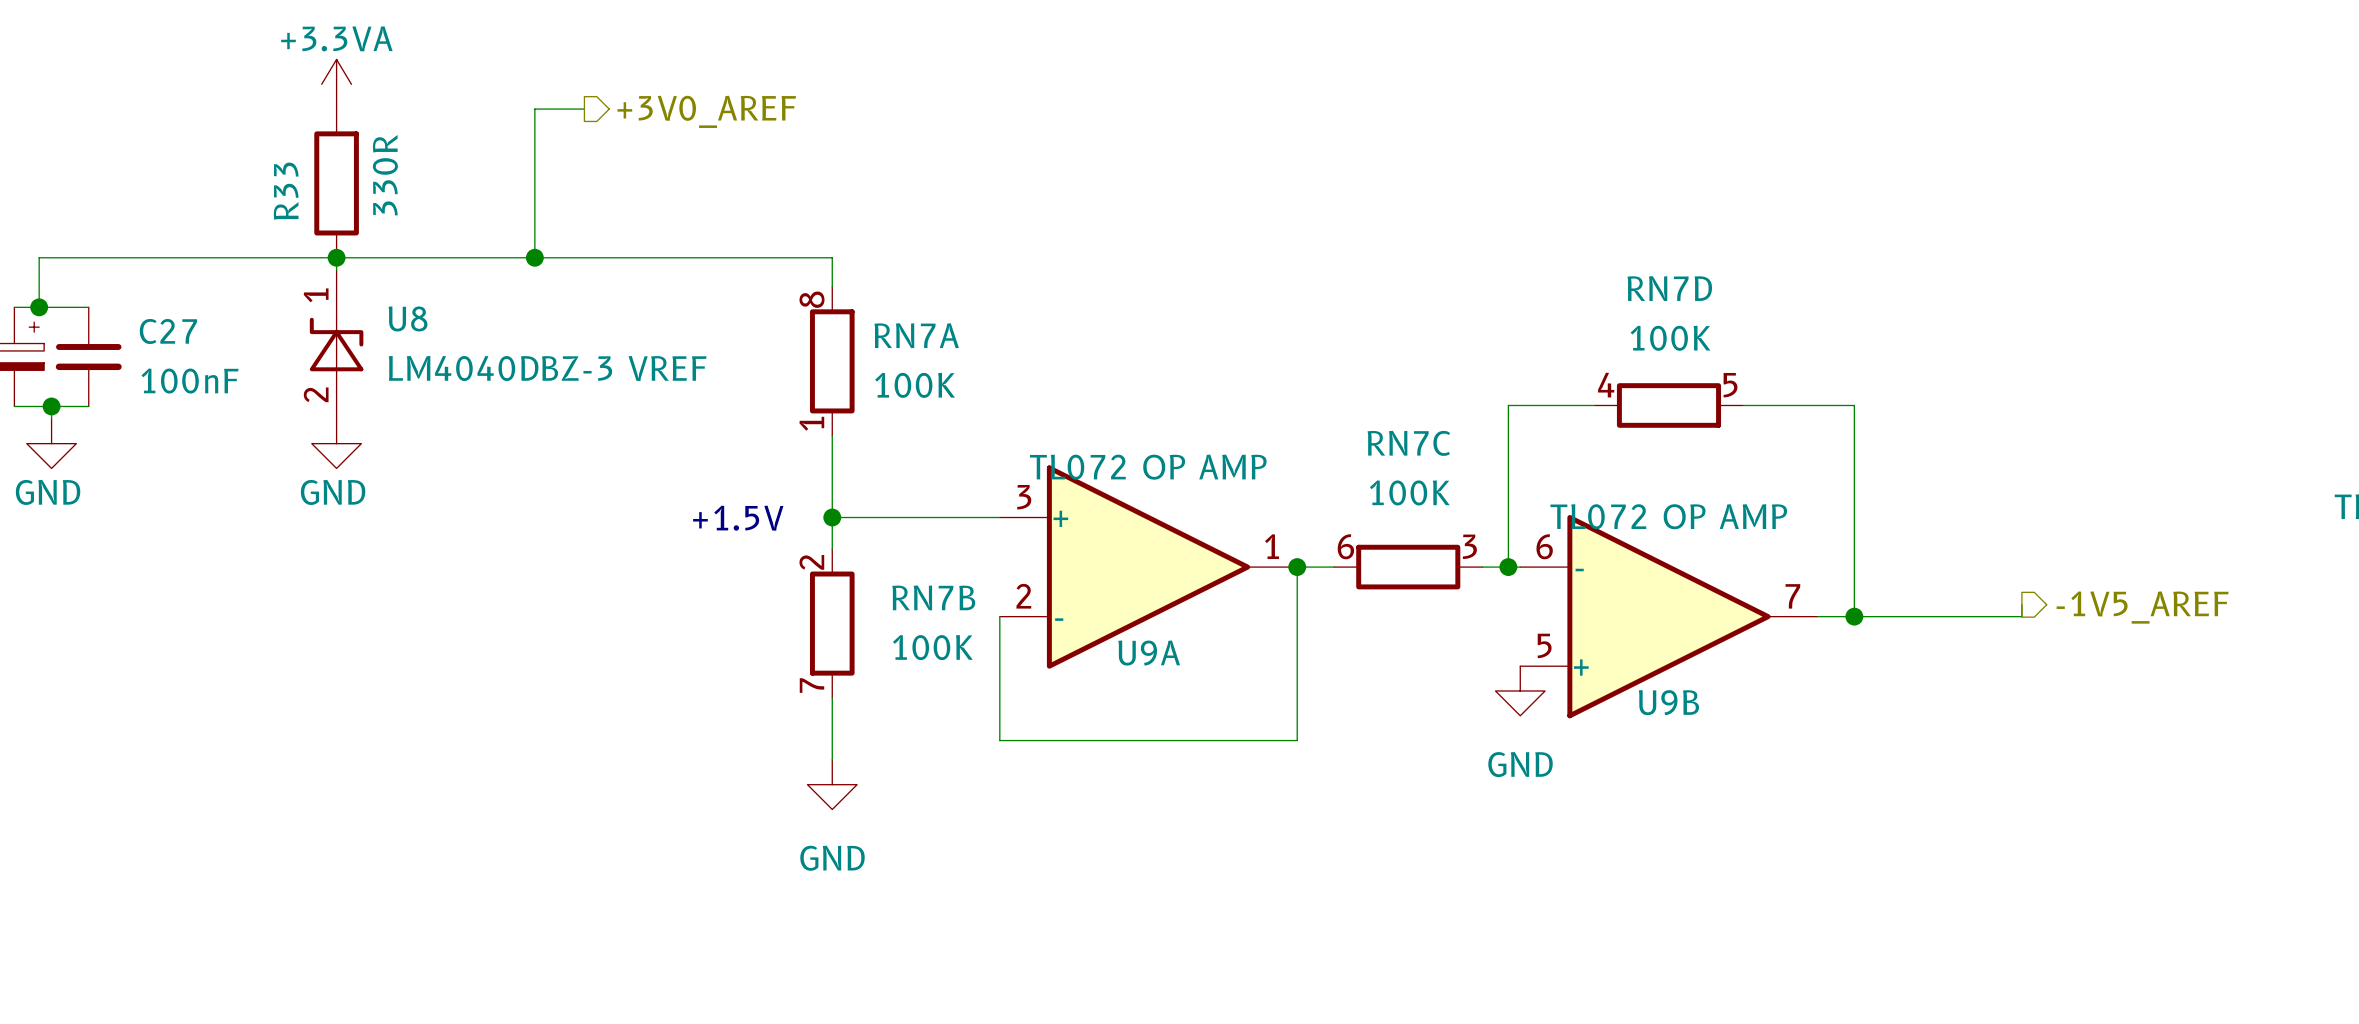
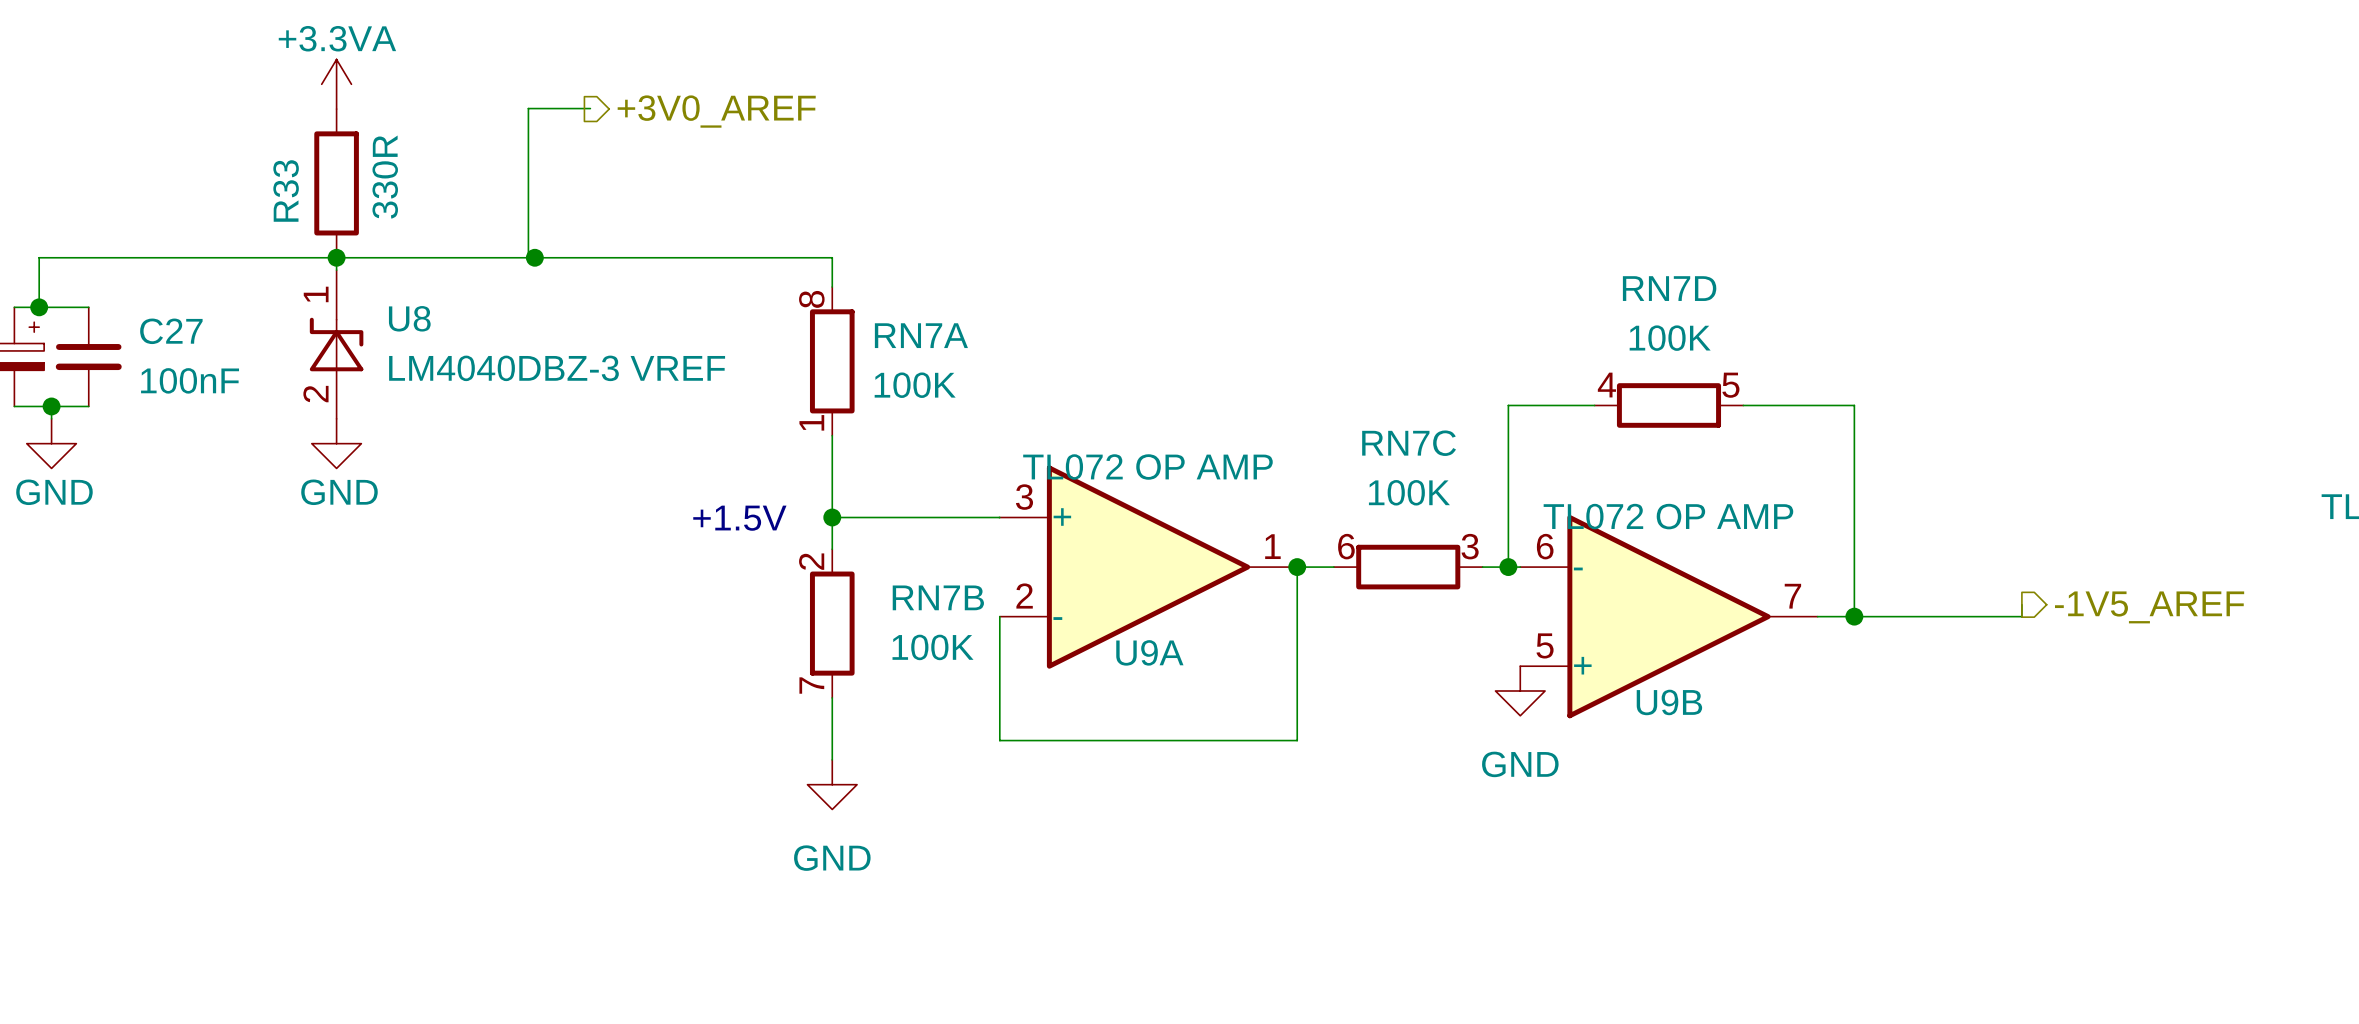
wire: none -> (590, 108) (528, 108) (528, 257)
wire: (584, 109) (534, 109) (534, 257) -> none

